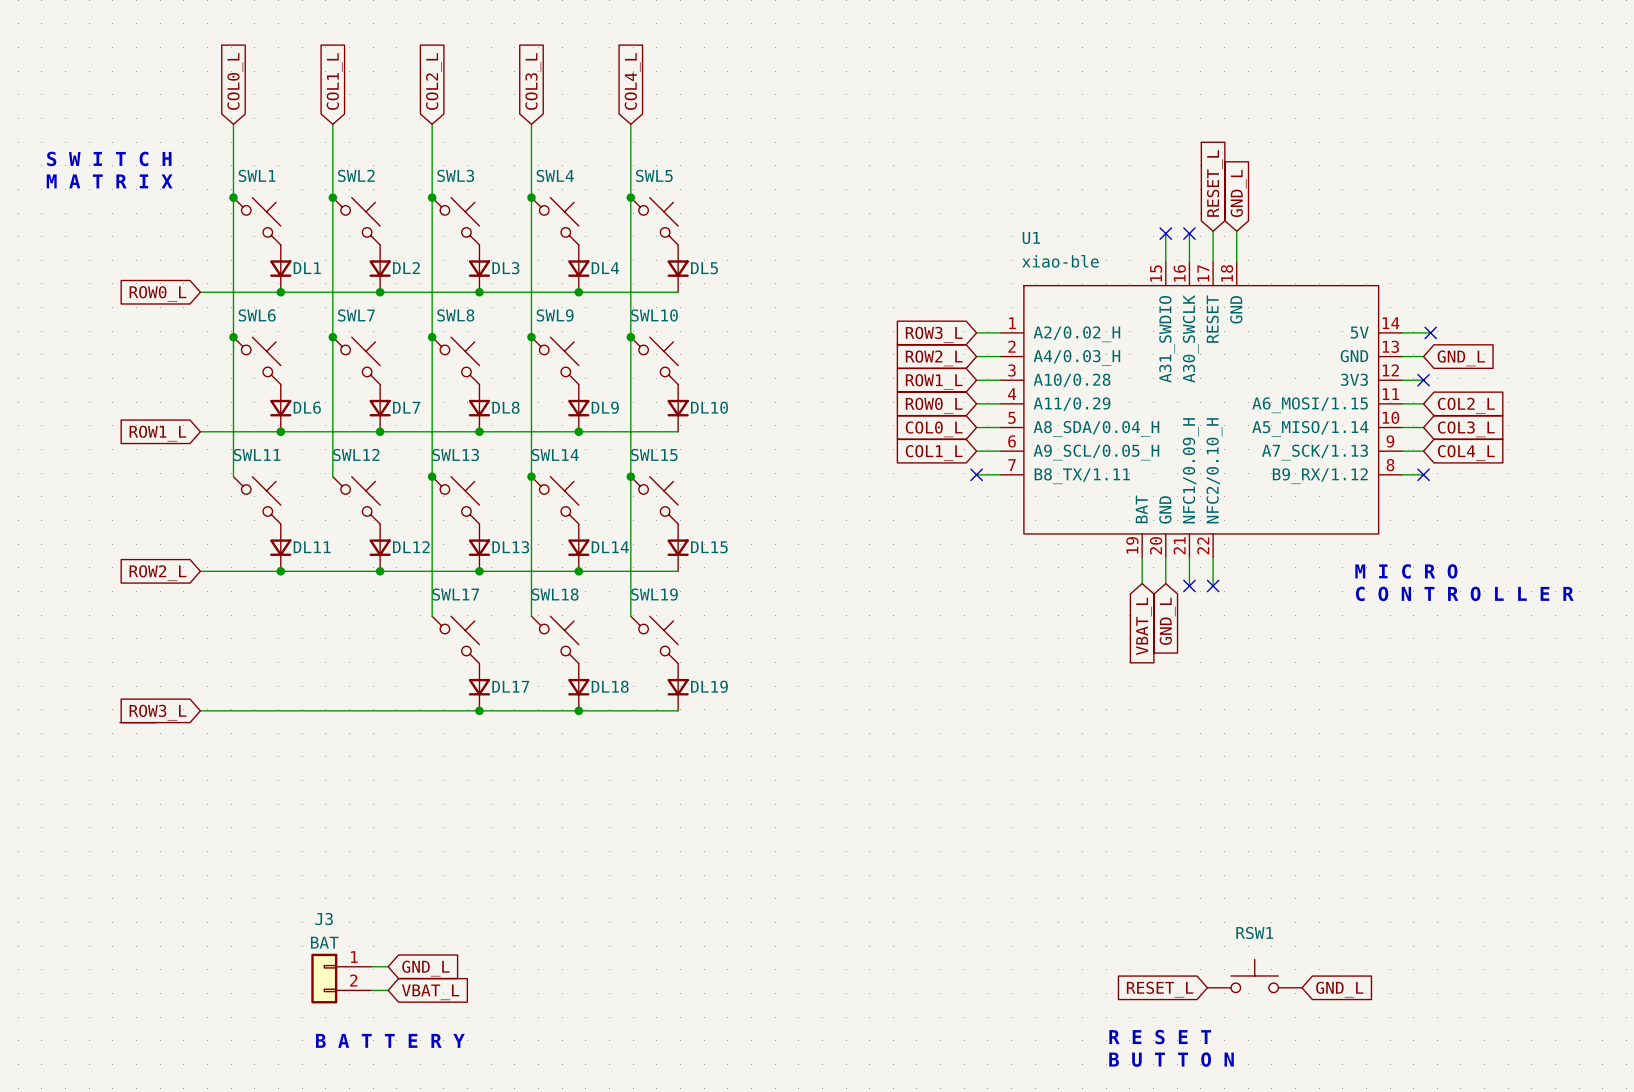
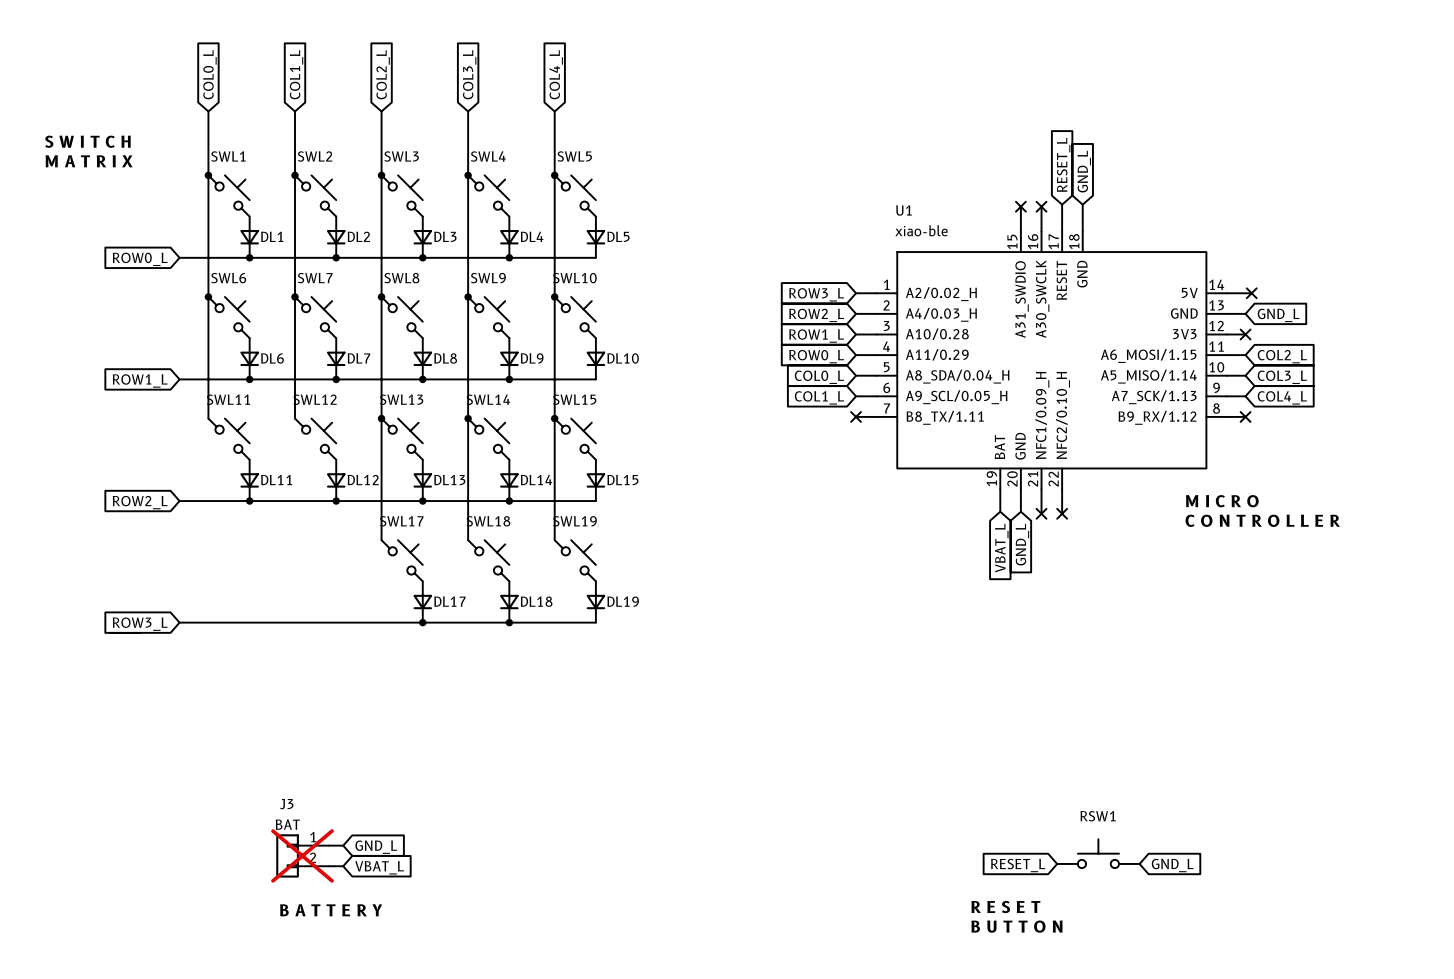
J3 do-not-place cross: none -> (302, 855)

